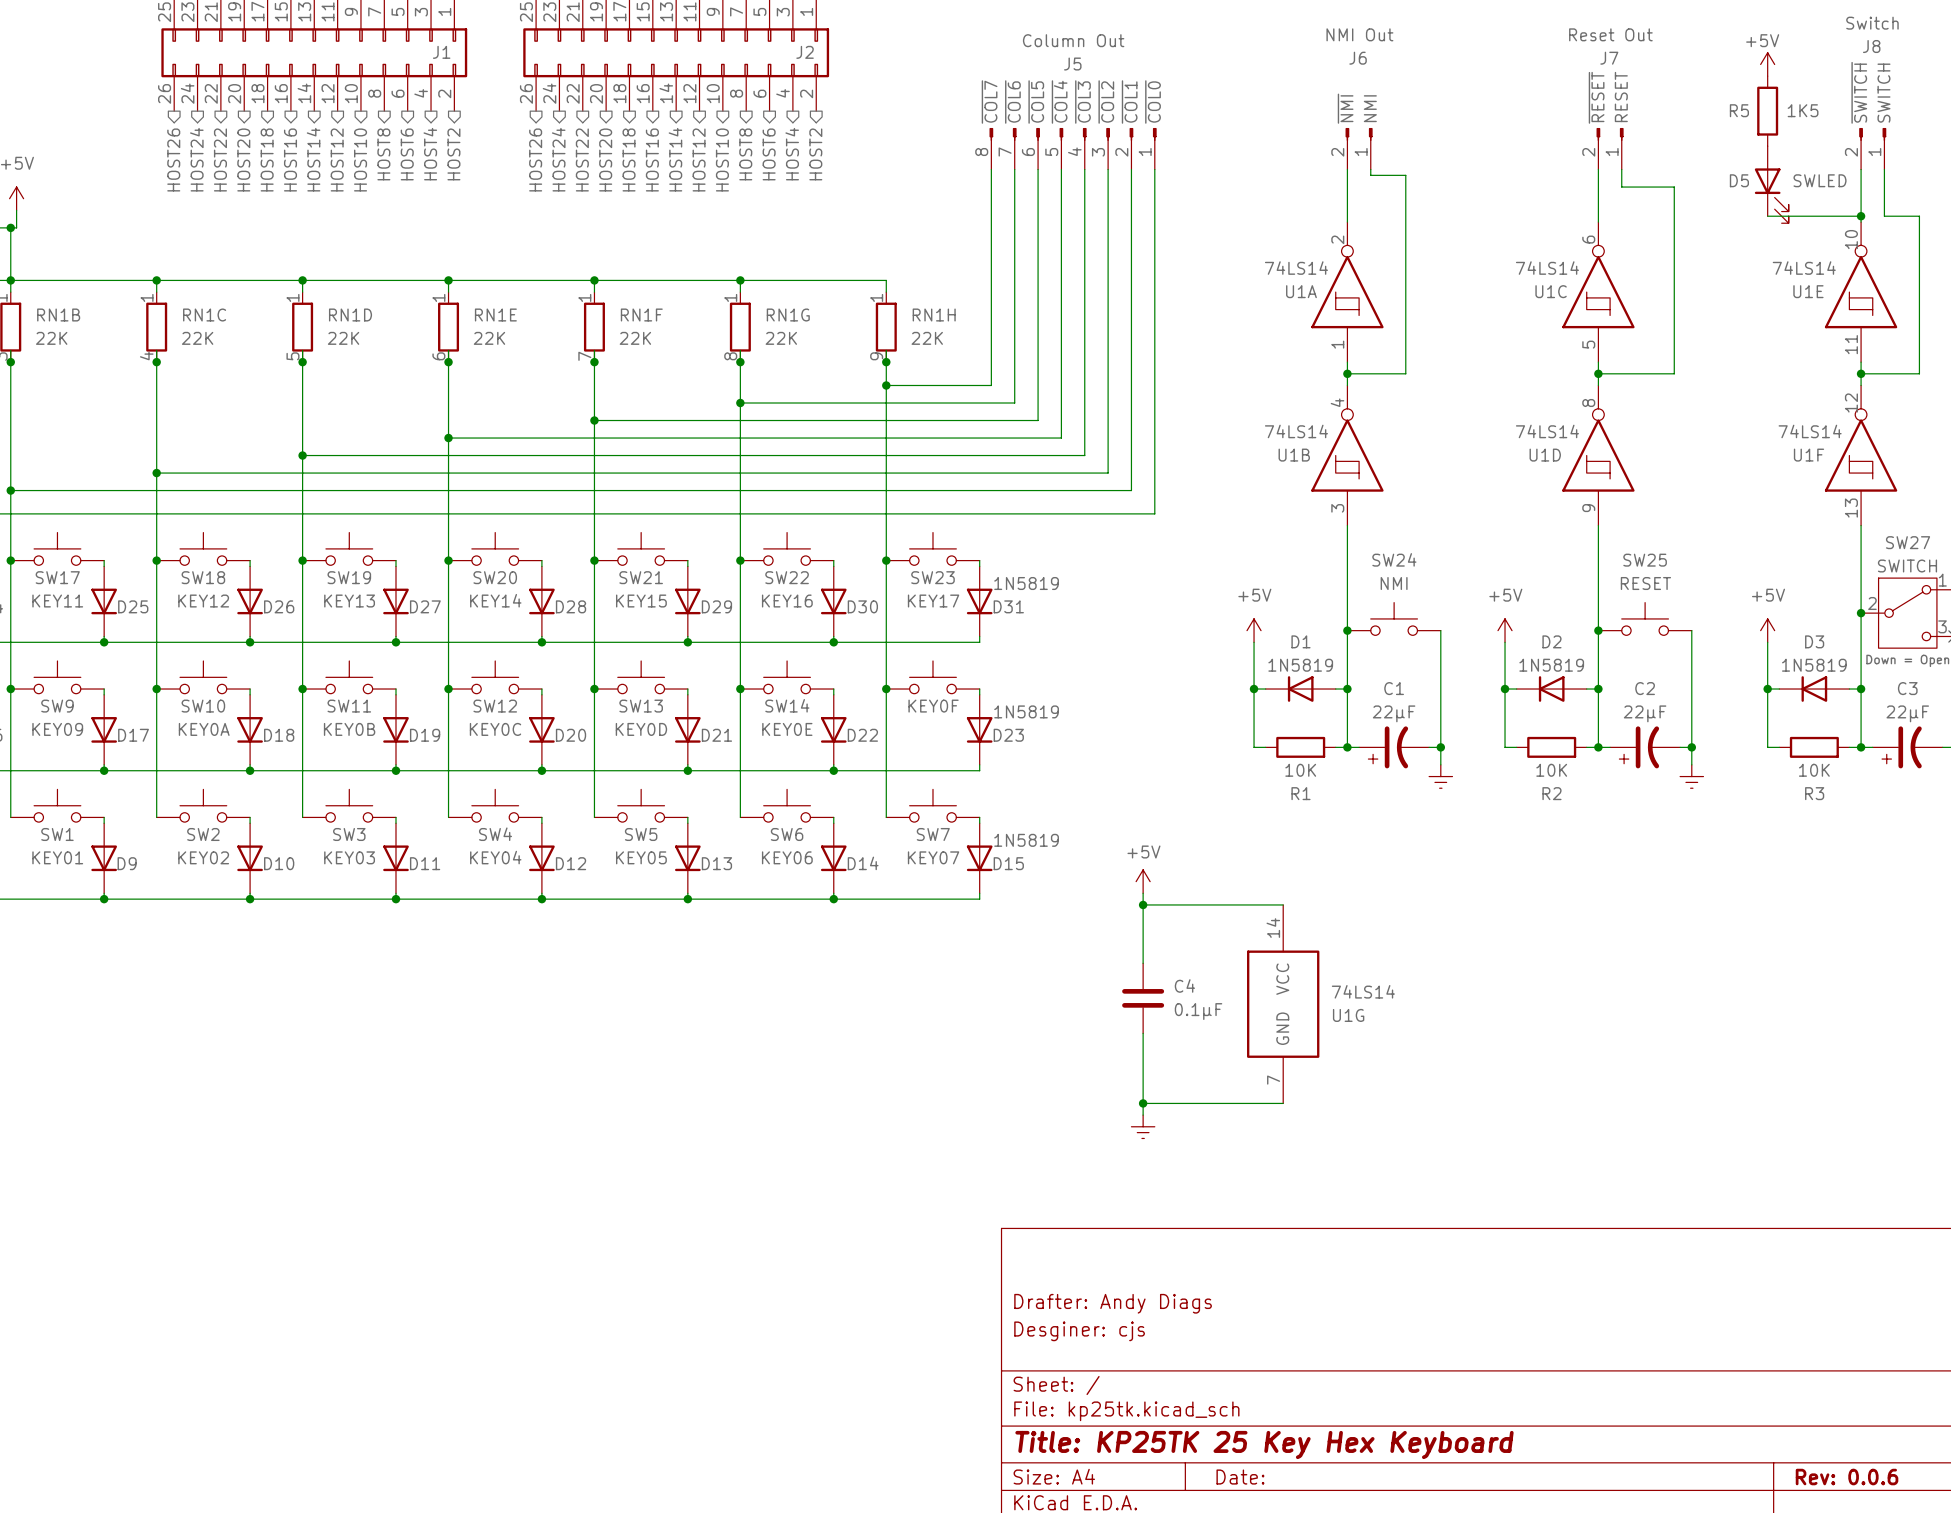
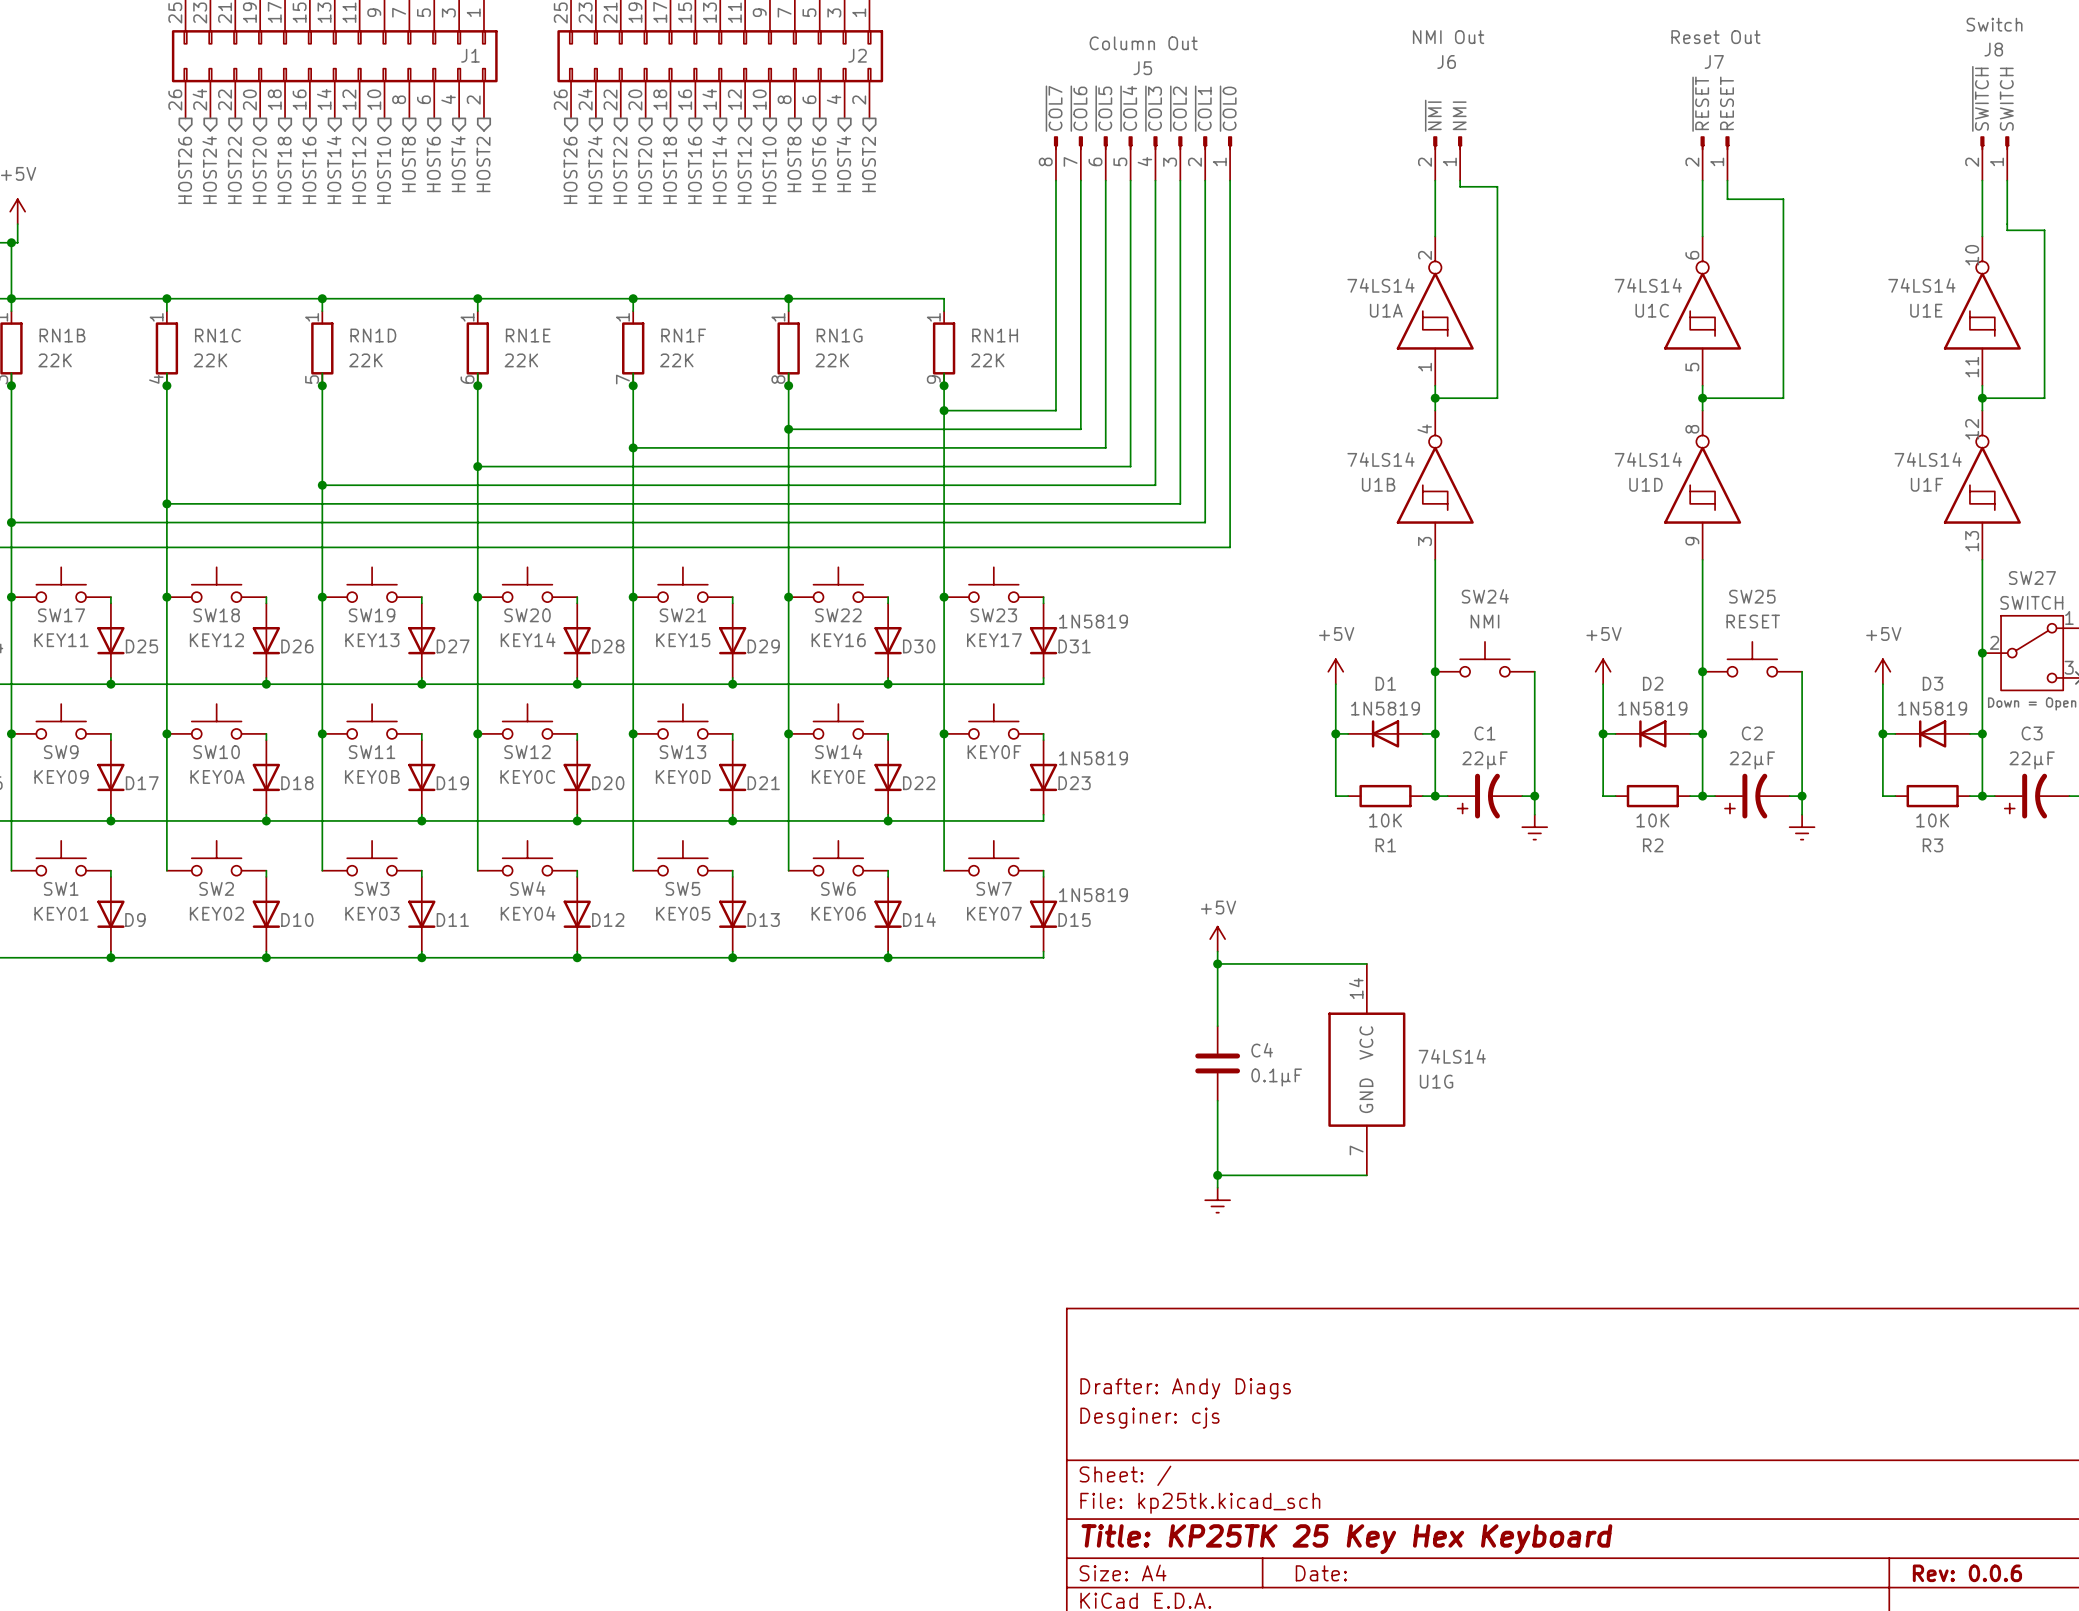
power symbol: +5V (1767, 64) -> none
R5: 1K5 (1767, 111) -> none
D5: SWLED (1771, 184) -> none
wire: (1767, 216) (1861, 216) -> none
junction: (1861, 216) -> none

